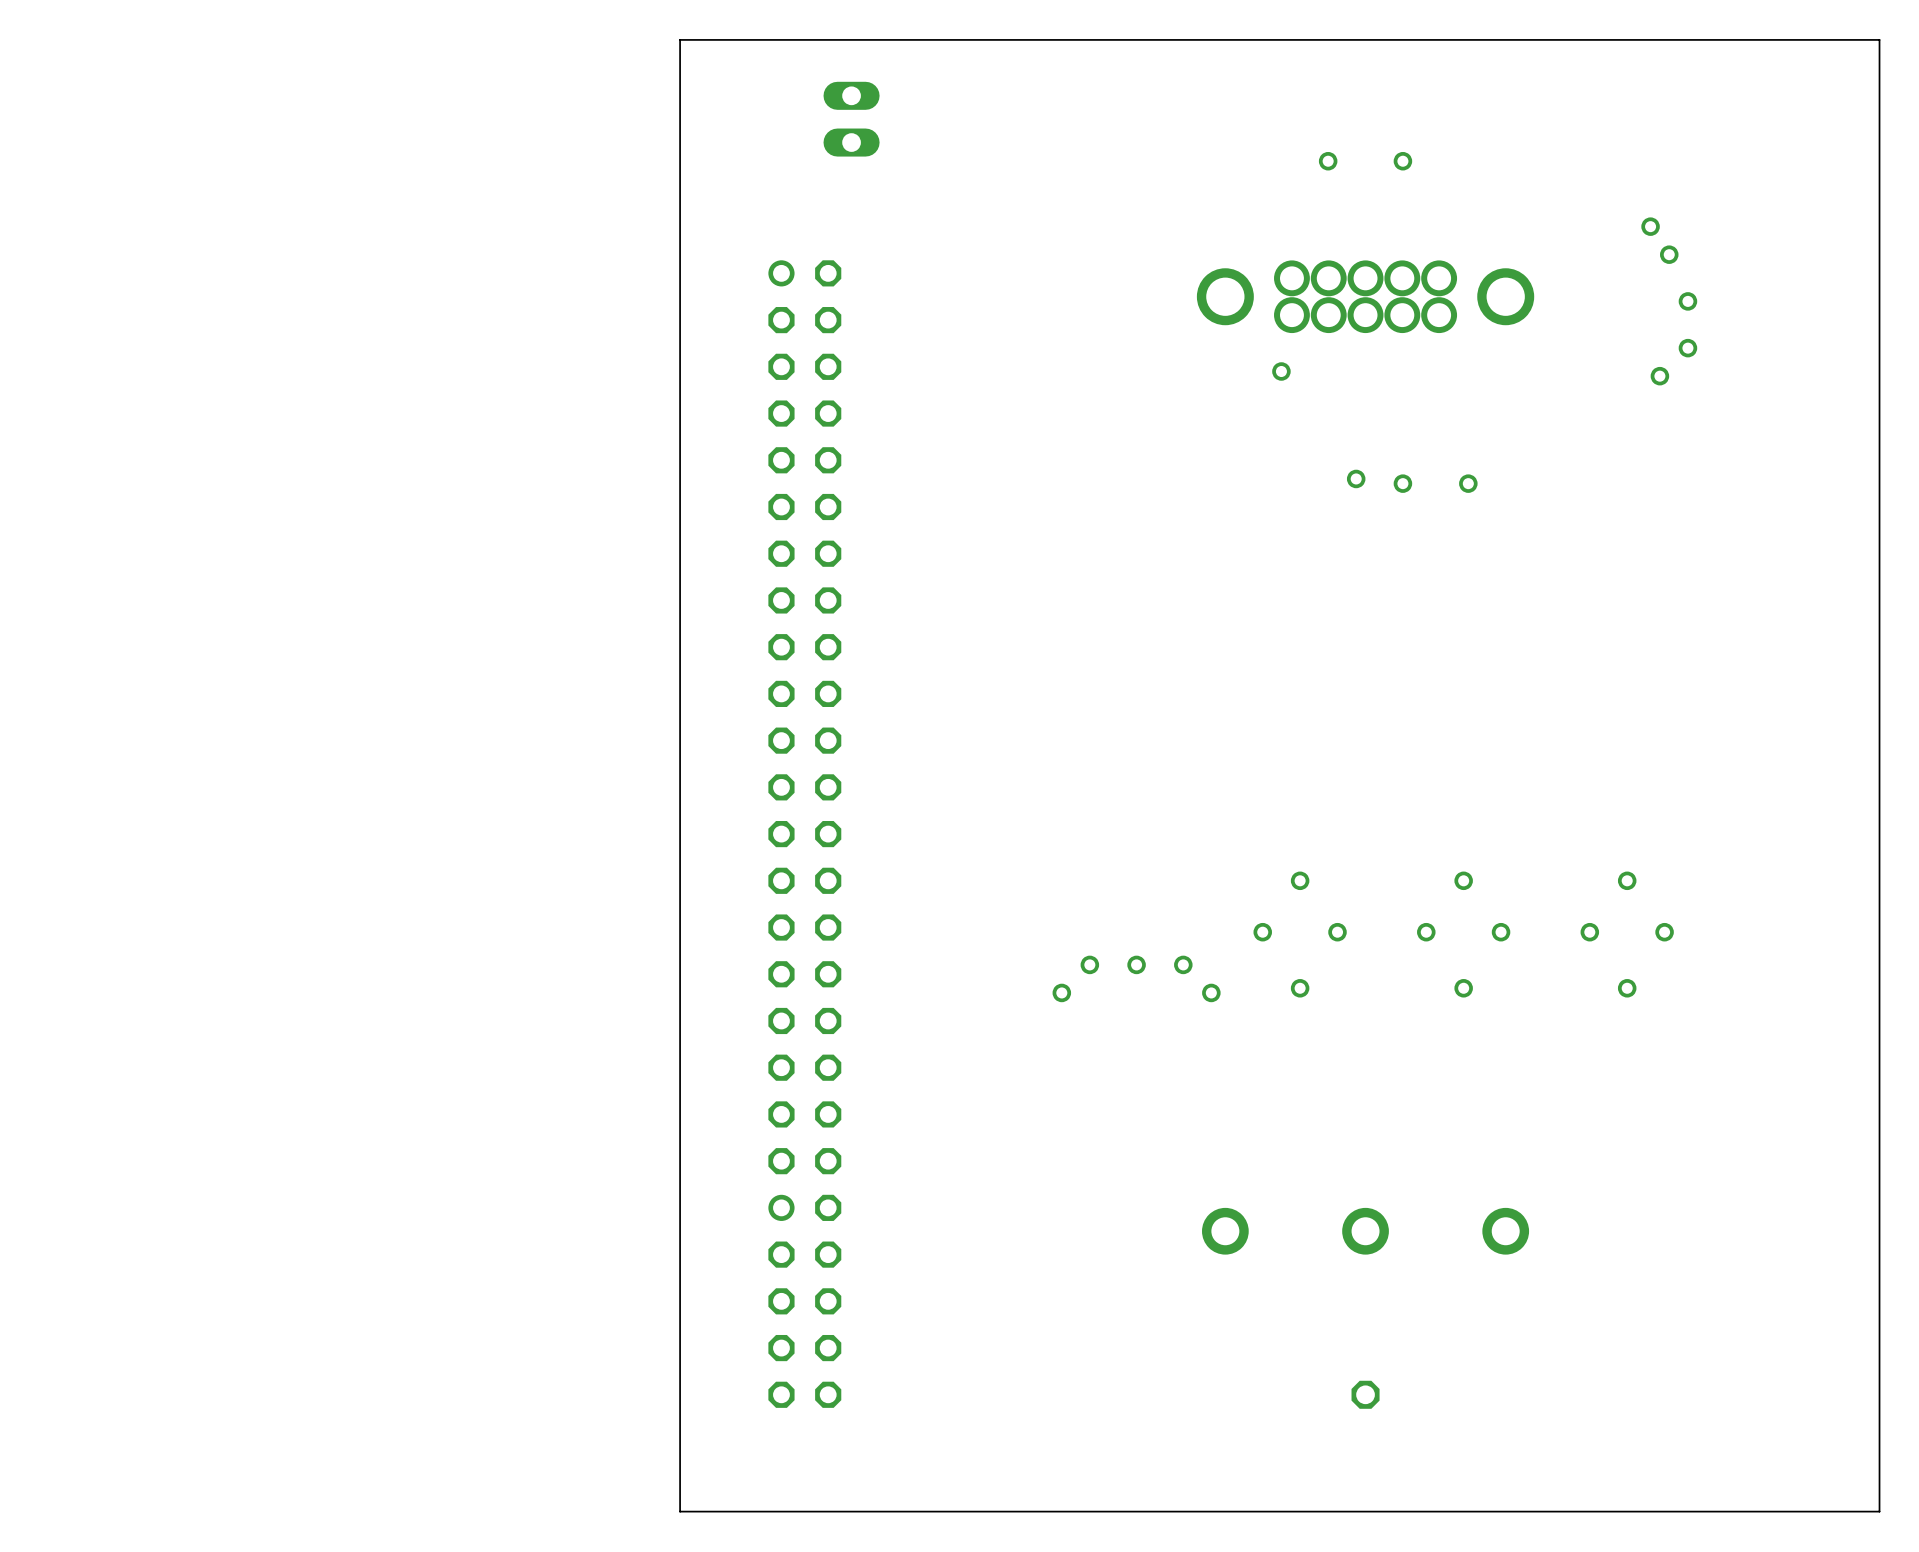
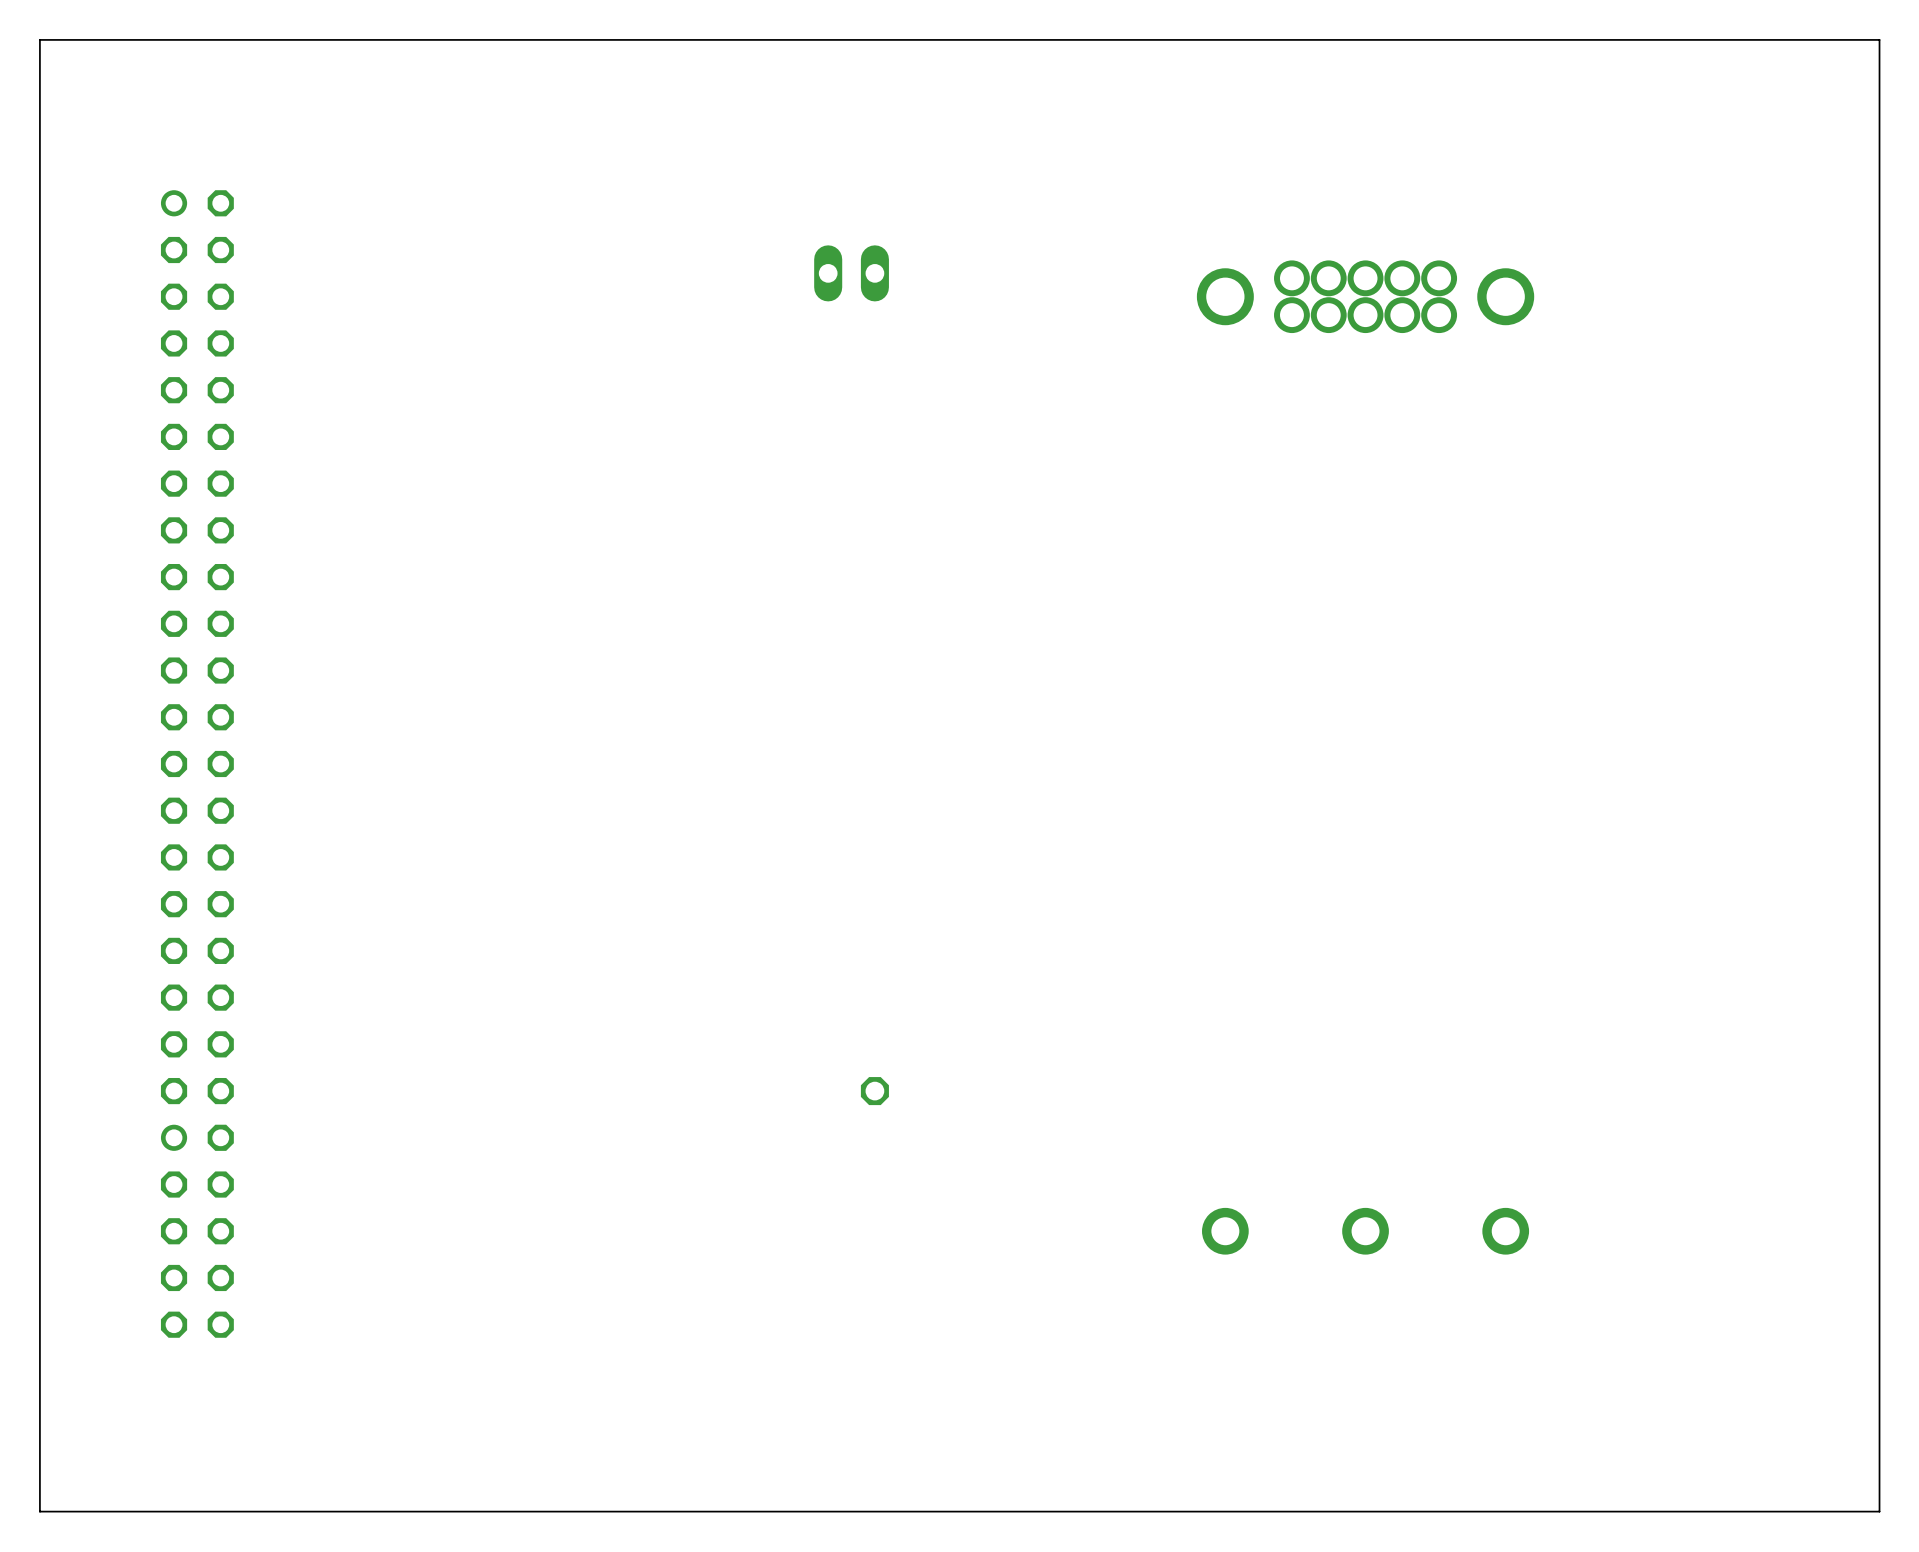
board edge: (680, 39) (680, 1511) -> (680, 39) (39, 39) (39, 1511) (680, 1511)
part rotation: 0° (851, 119) -> 90° clockwise (851, 273)
part position: (851, 119) -> (851, 273)
via: (1328, 161) -> none
via: (1402, 161) -> none
via: (1650, 226) -> none
via: (1669, 254) -> none
via: (1687, 301) -> none
via: (1687, 348) -> none
via: (1281, 371) -> none
via: (1659, 376) -> none
via: (1356, 478) -> none
via: (1402, 483) -> none
via: (1468, 483) -> none
part: none -> (197, 763)
part: (804, 834) -> none
via: (1300, 880) -> none
via: (1463, 880) -> none
via: (1627, 880) -> none
via: (1262, 932) -> none
via: (1337, 932) -> none
via: (1426, 932) -> none
via: (1501, 932) -> none
via: (1589, 932) -> none
via: (1664, 932) -> none
via: (1089, 964) -> none
via: (1136, 964) -> none
via: (1183, 964) -> none
via: (1300, 988) -> none
via: (1463, 988) -> none
via: (1627, 988) -> none
via: (1061, 992) -> none
via: (1211, 992) -> none
part: none -> (874, 1091)
part: (1365, 1394) -> none

